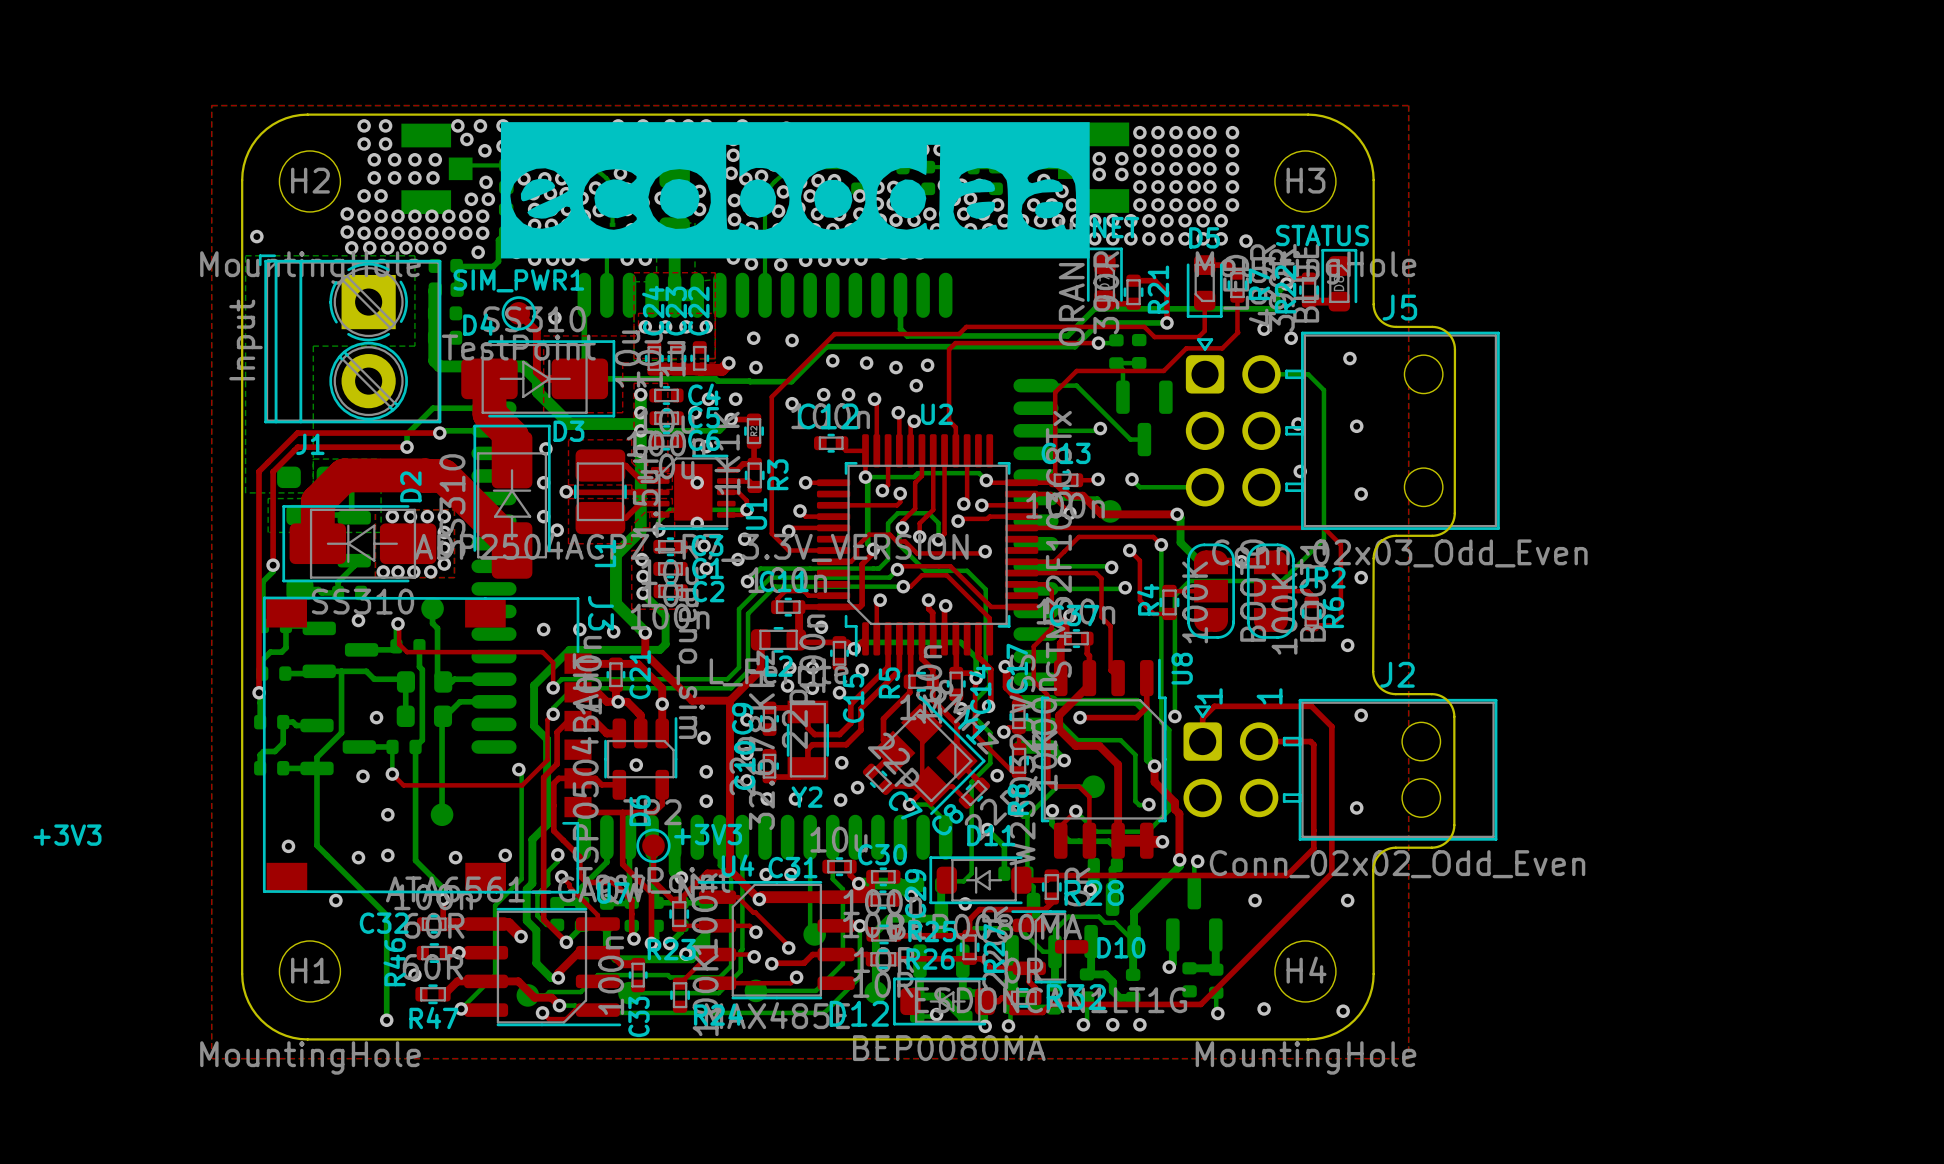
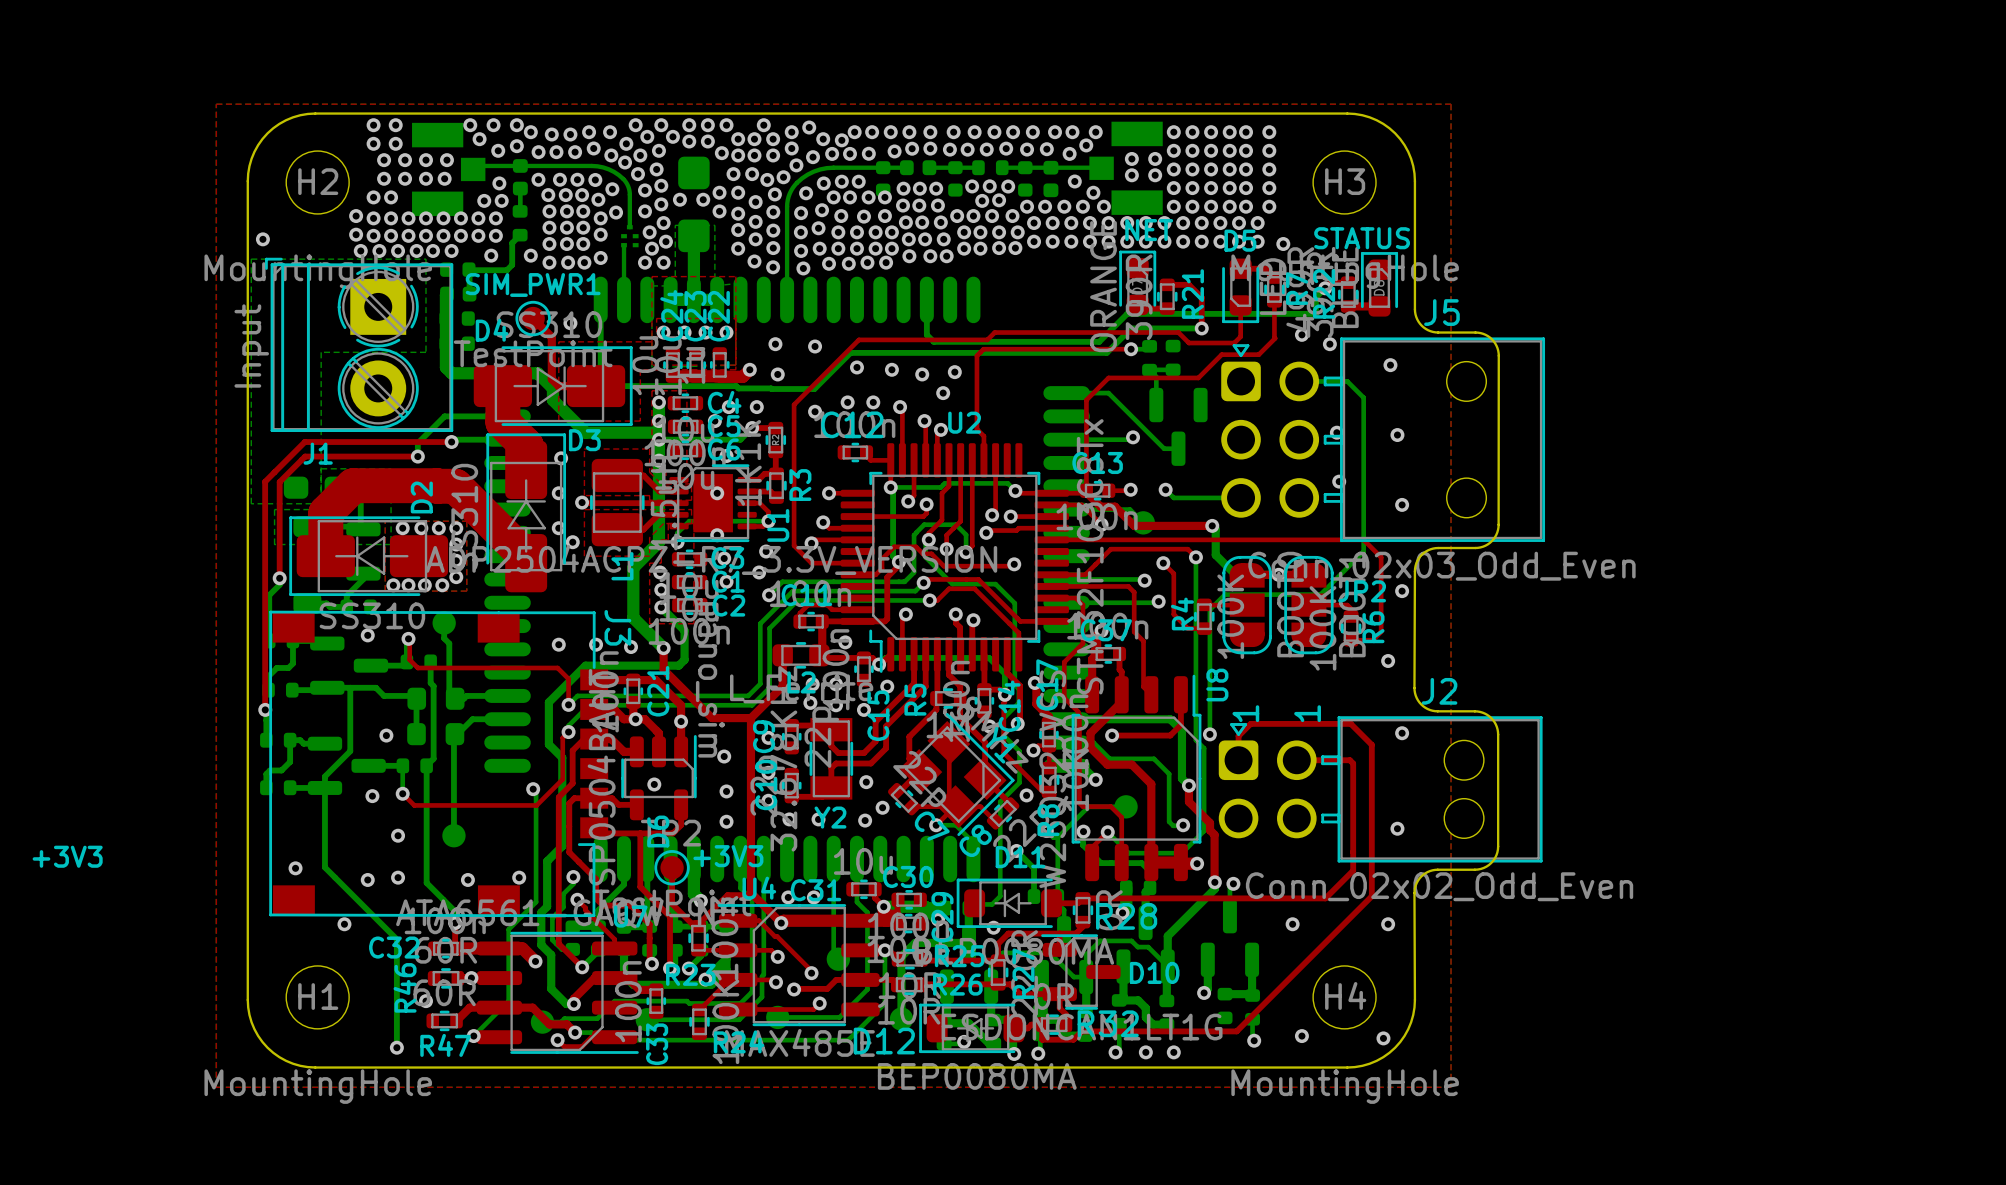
drawing: [500, 122, 1090, 259] -> none

